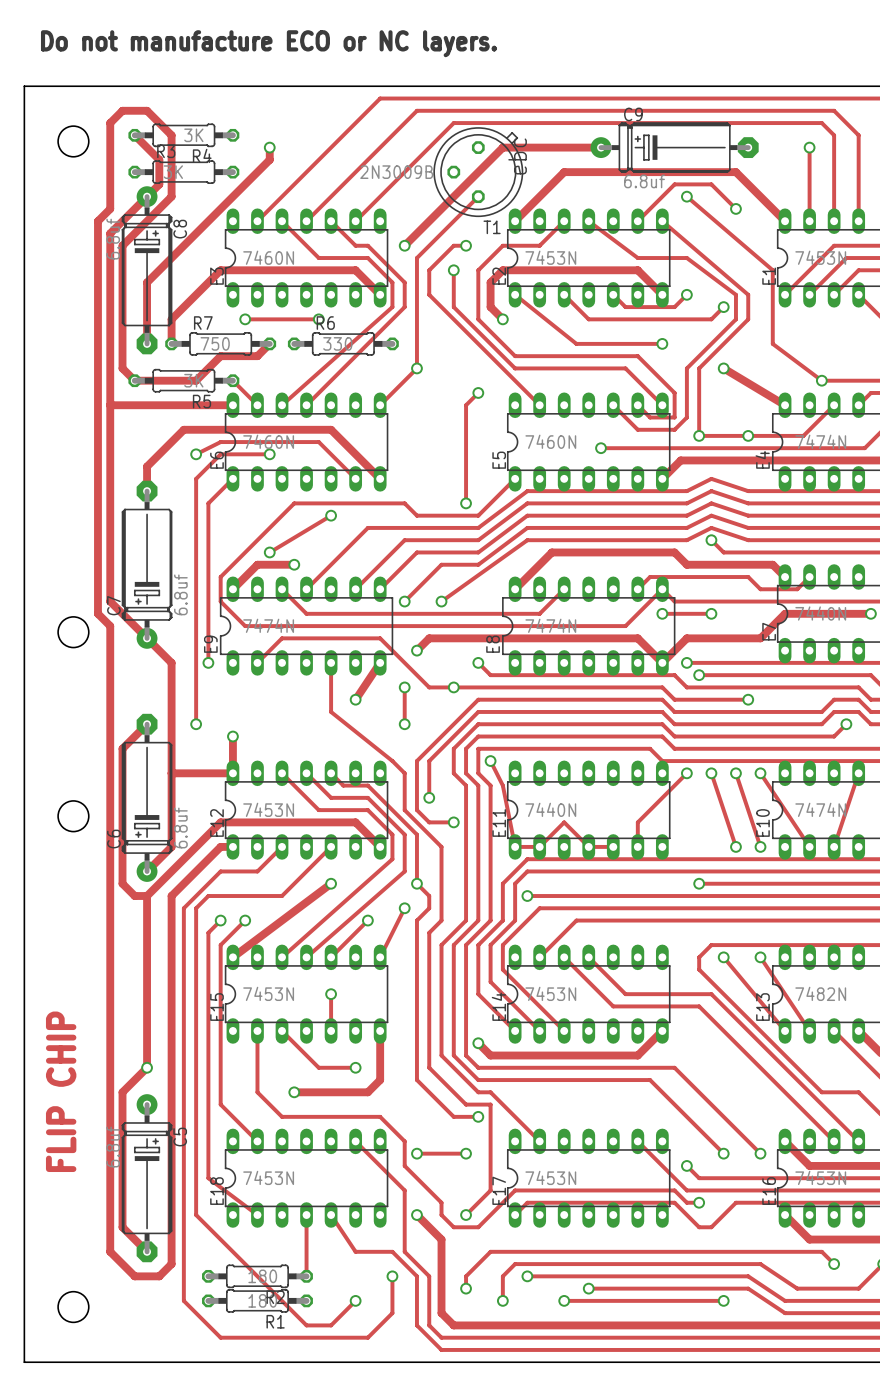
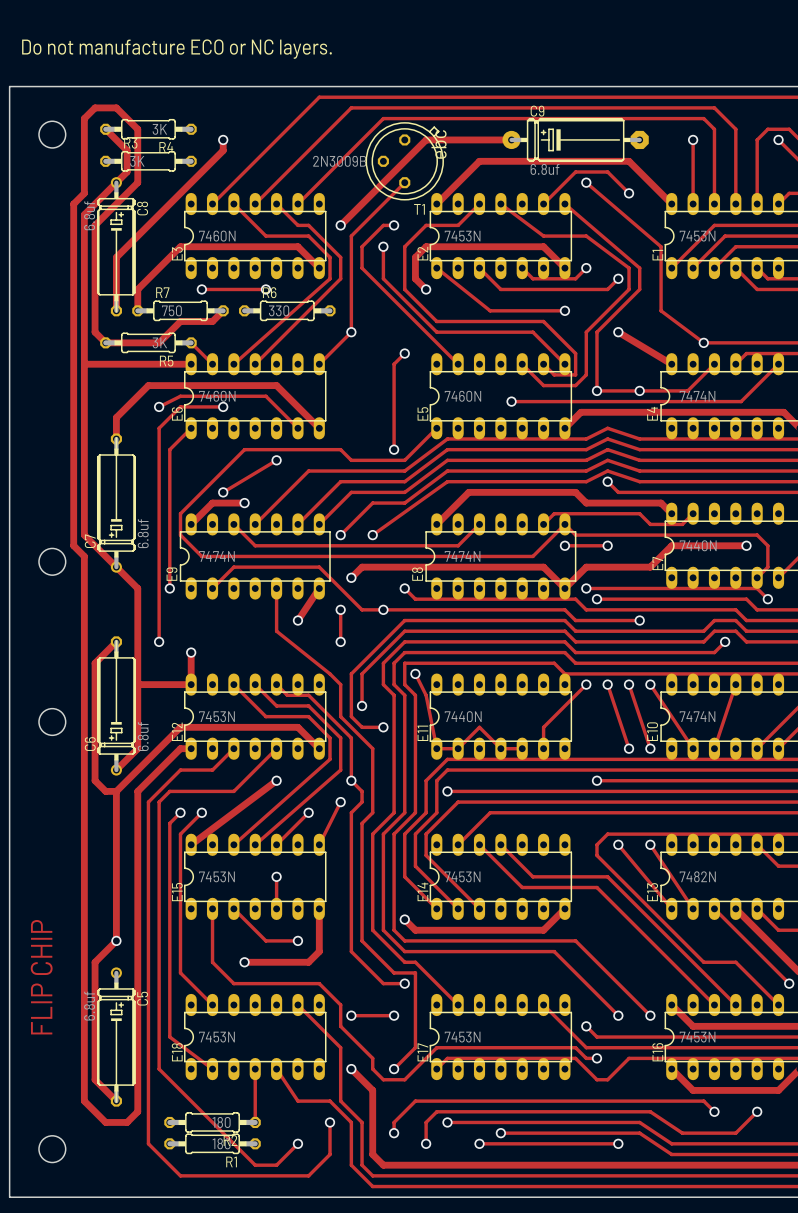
C8 footprint: [121, 186, 173, 355] -> [97, 177, 136, 317]
C7 footprint: [121, 480, 173, 649] -> [97, 433, 136, 573]
C6 footprint: [121, 713, 173, 882] -> [97, 636, 136, 776]
C5 footprint: [121, 1094, 173, 1263] -> [97, 967, 136, 1107]

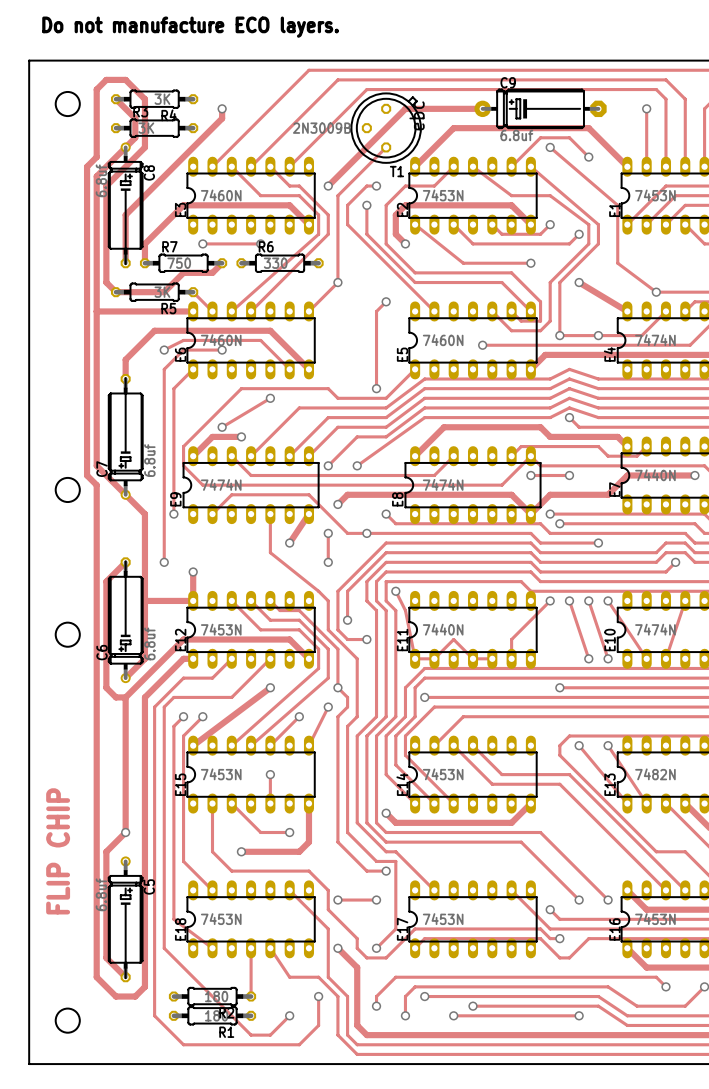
text: Do not manufacture ECO or NC layers. (176, 49) -> Do not manufacture ECO layers. (190, 27)

